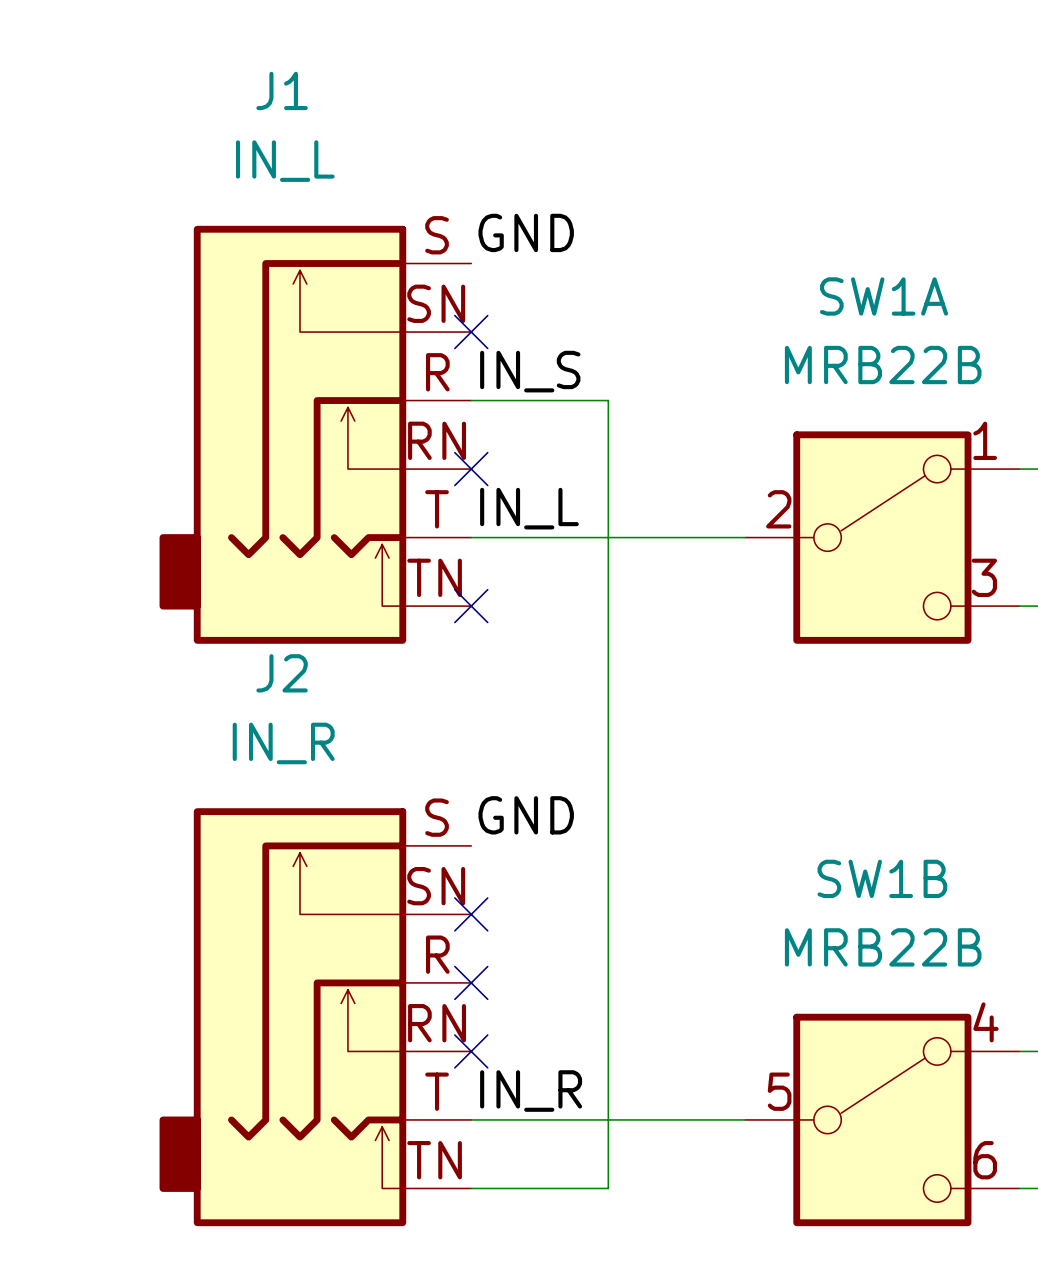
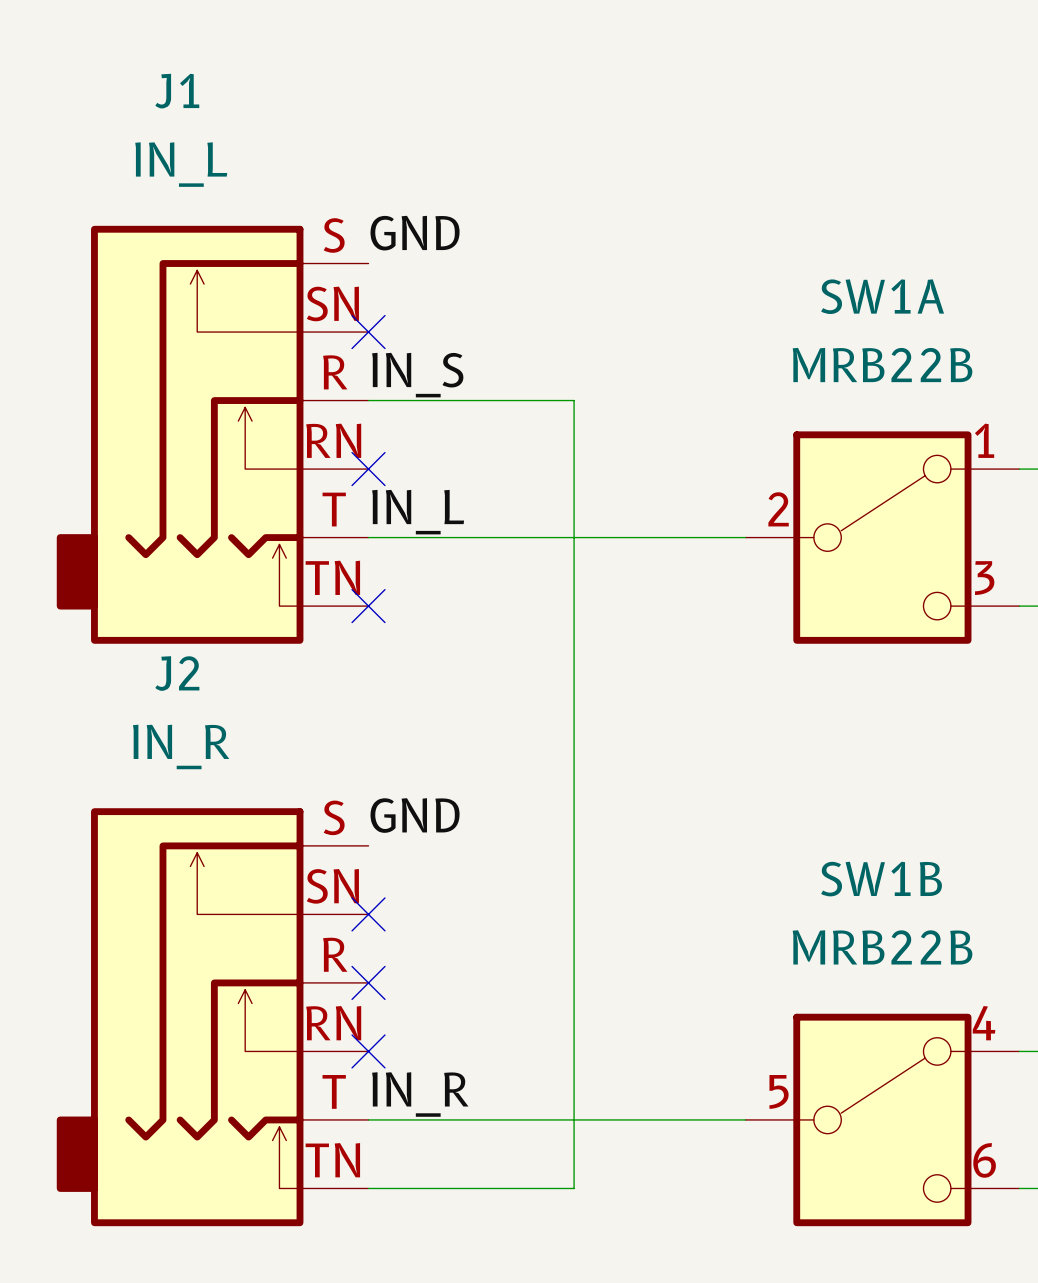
label position: GND (526, 232) -> GND (415, 233)
no-connect mark: none -> (368, 332)
no-connect mark: (471, 332) -> none
label position: IN_S (530, 371) -> IN_S (417, 375)
wire: (574, 400) (608, 400) (608, 1188) (574, 1188) -> (574, 400) (574, 1188)
J1 position: (315, 434) -> (212, 434)
no-connect mark: none -> (368, 469)
no-connect mark: (471, 469) -> none
label position: IN_L (529, 508) -> IN_L (418, 512)
no-connect mark: none -> (368, 606)
no-connect mark: (471, 606) -> none
label position: GND (526, 815) -> GND (415, 815)
no-connect mark: none -> (368, 914)
no-connect mark: (471, 914) -> none
no-connect mark: none -> (368, 982)
no-connect mark: (471, 982) -> none
J2 position: (315, 1017) -> (212, 1017)
no-connect mark: none -> (368, 1051)
no-connect mark: (471, 1051) -> none
label position: IN_R (531, 1091) -> IN_R (420, 1094)

